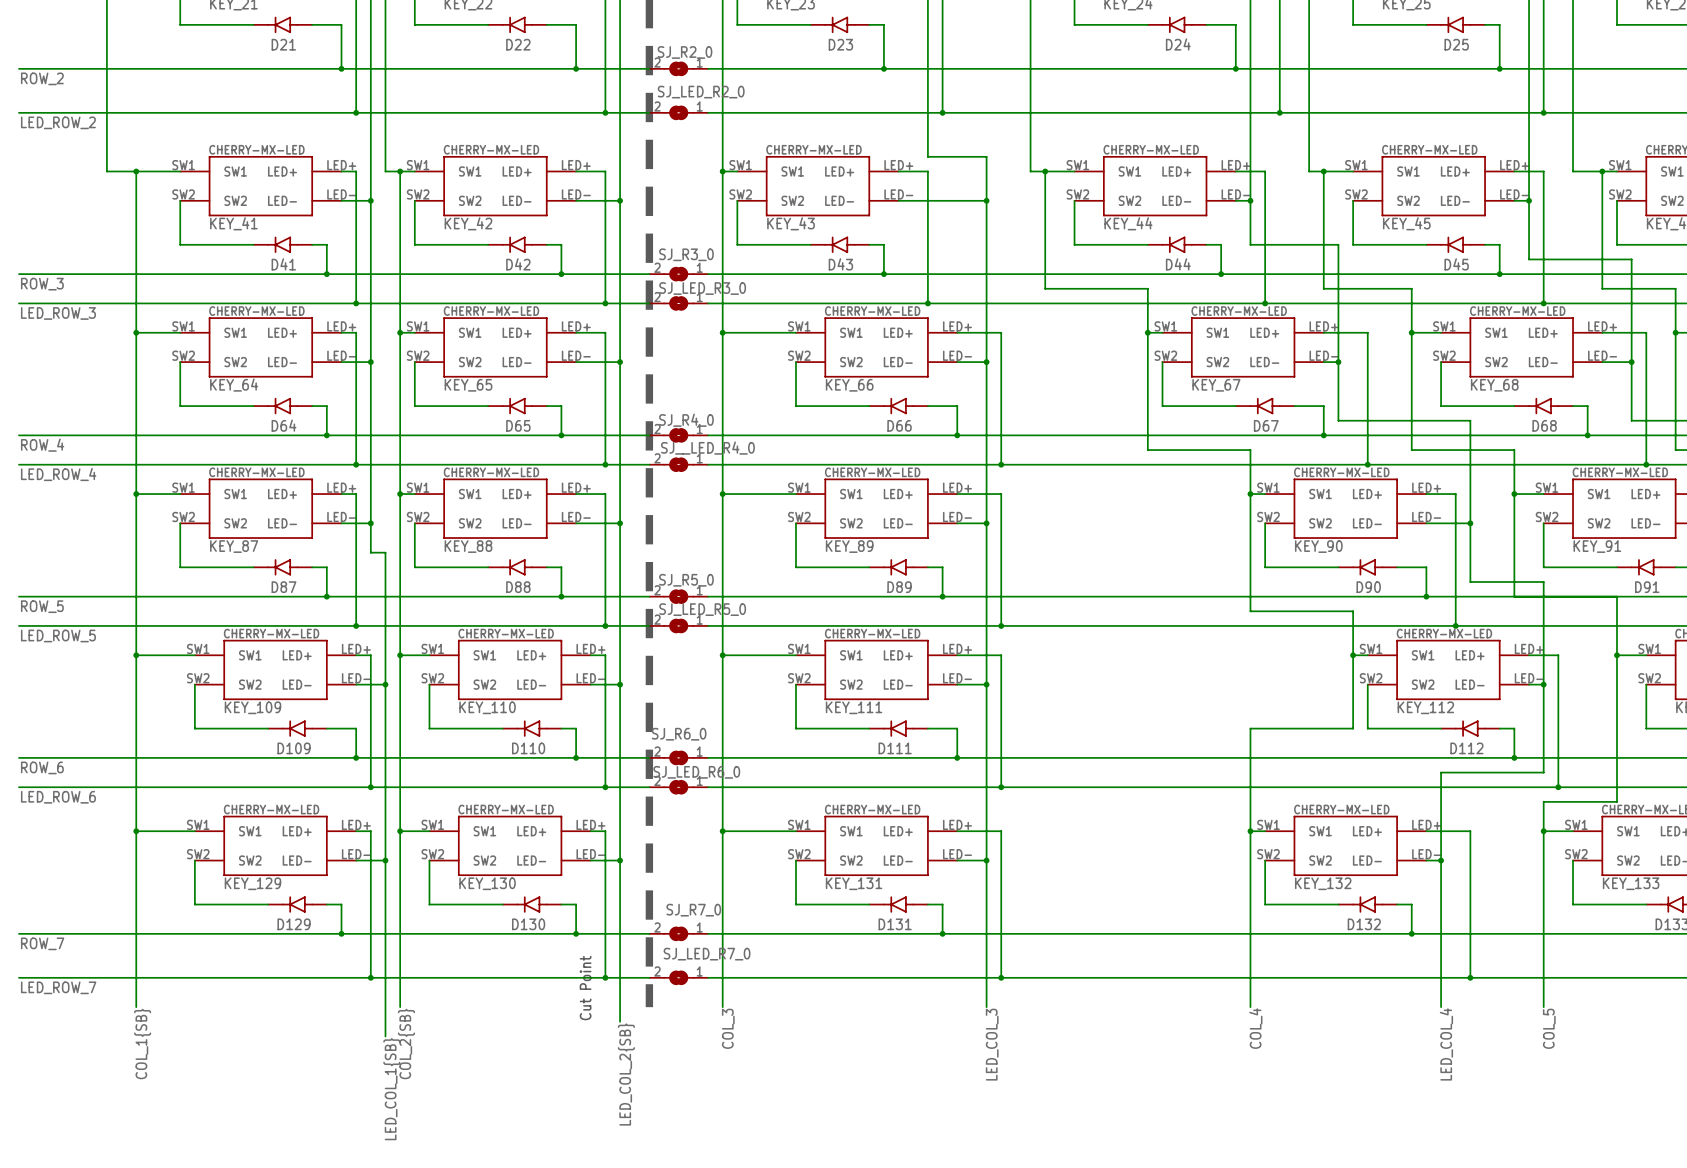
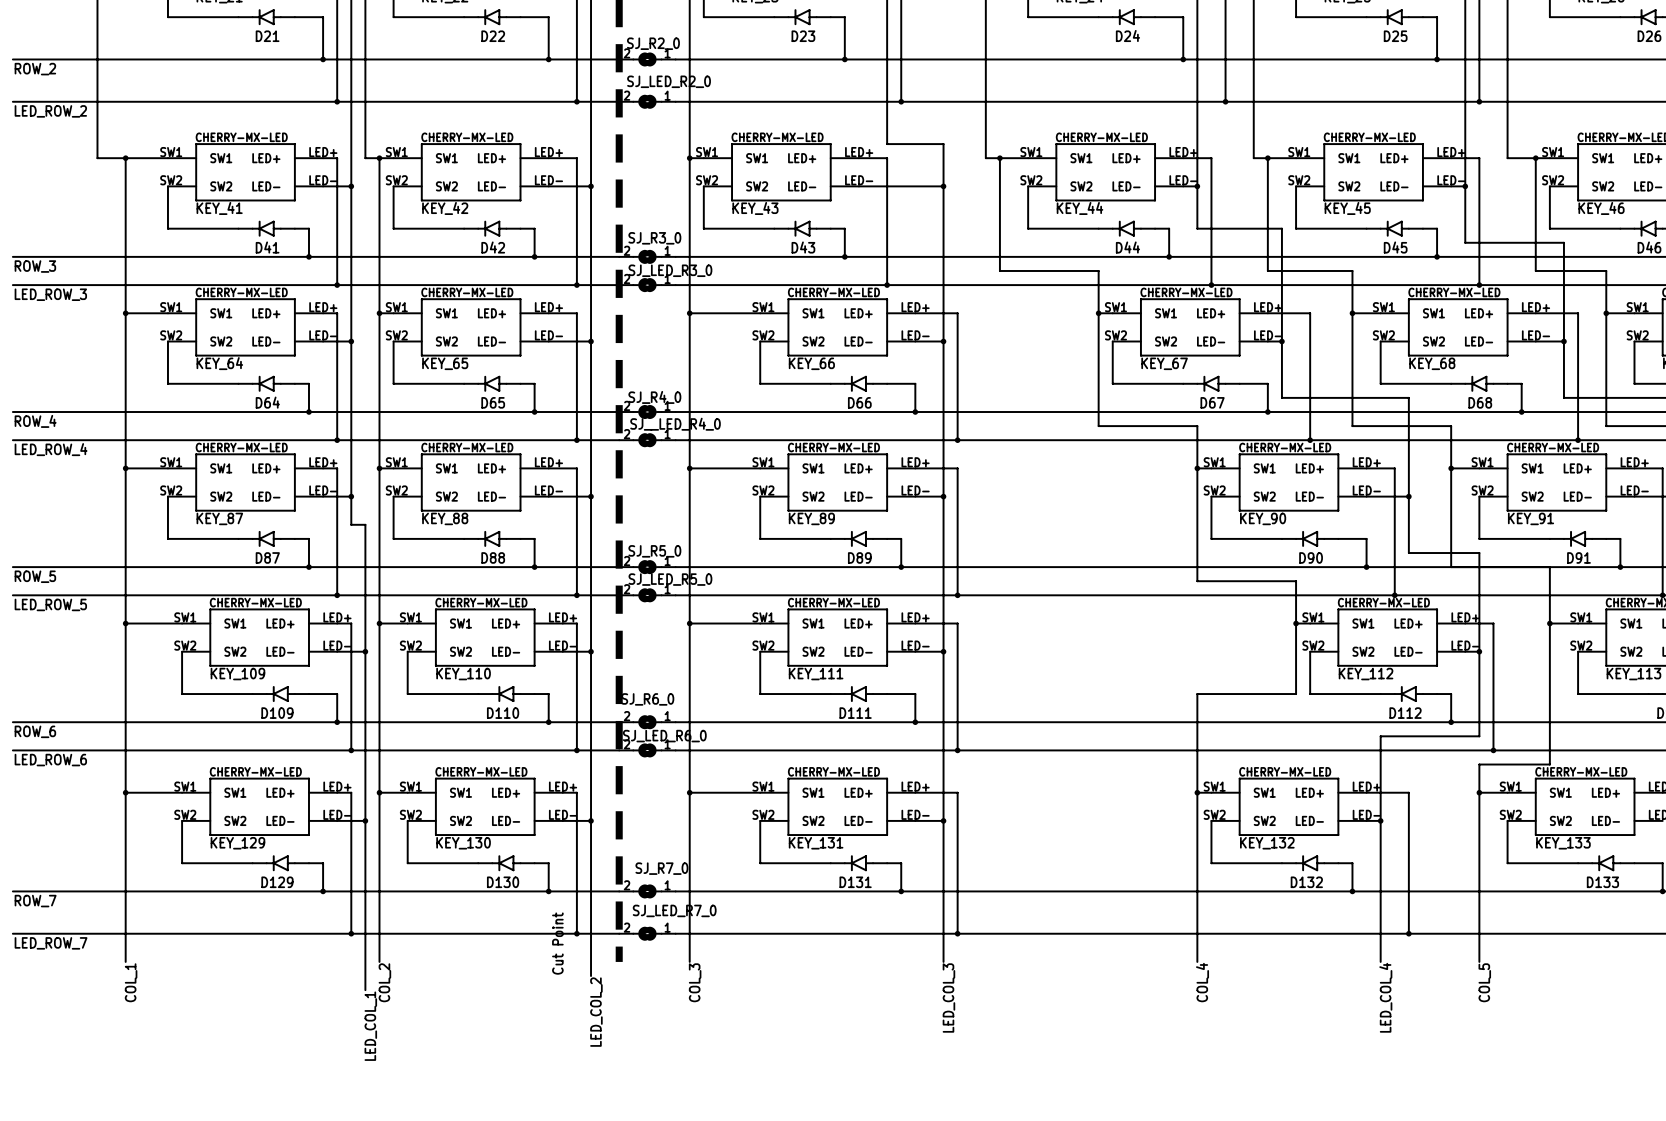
label: COL_1{SB} (142, 1043) -> COL_1 (131, 982)
label: COL_2{SB} (406, 1043) -> COL_2 (384, 982)
label: LED_COL_2{SB} (626, 1074) -> LED_COL_2 (596, 1012)
label: LED_COL_1{SB} (391, 1089) -> LED_COL_1 (370, 1026)

